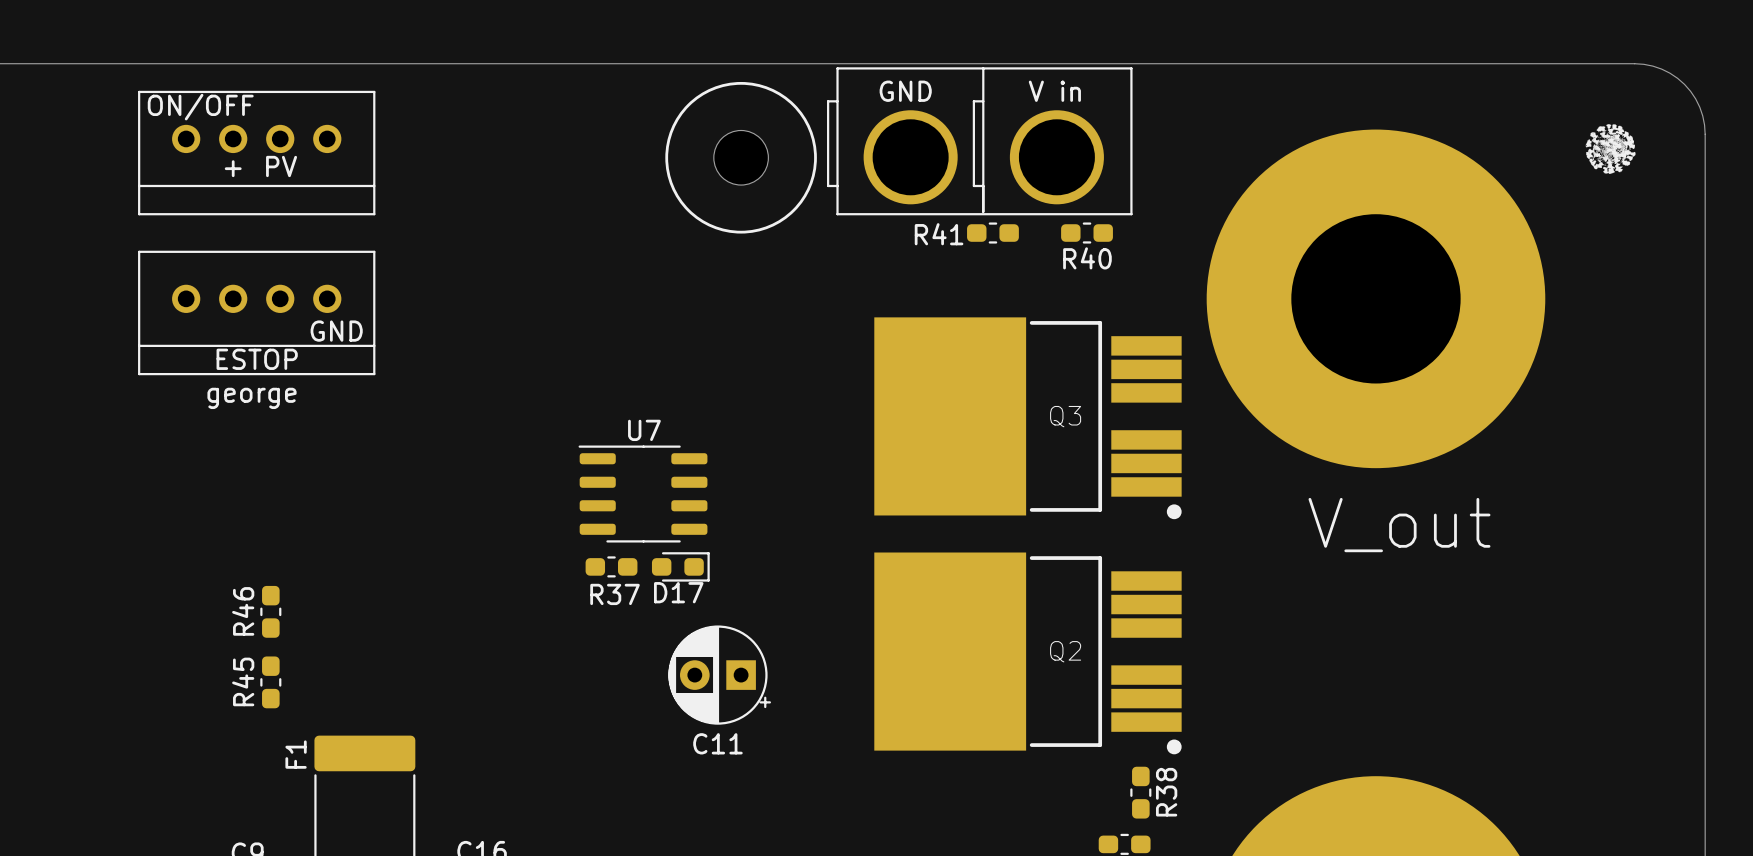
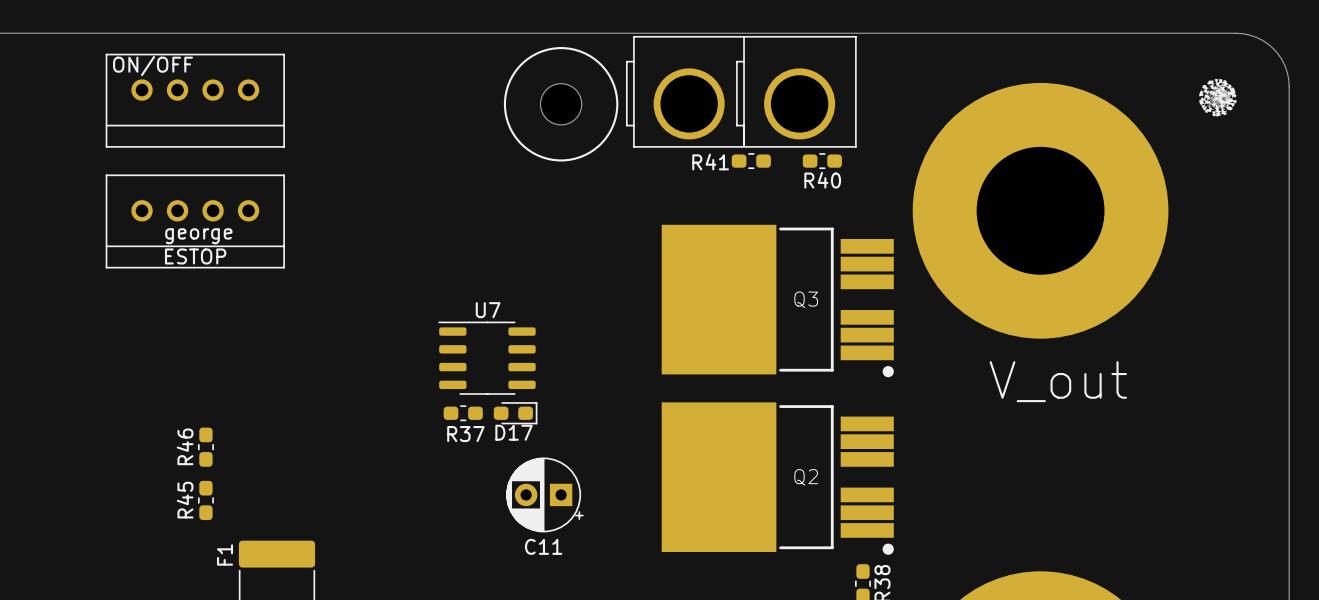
text: GND (905, 91) -> none
text: V in (1054, 91) -> none
text: PV (281, 166) -> none
text: + (233, 168) -> none
text: GND (336, 331) -> none
text position: george (252, 398) -> george (198, 236)

